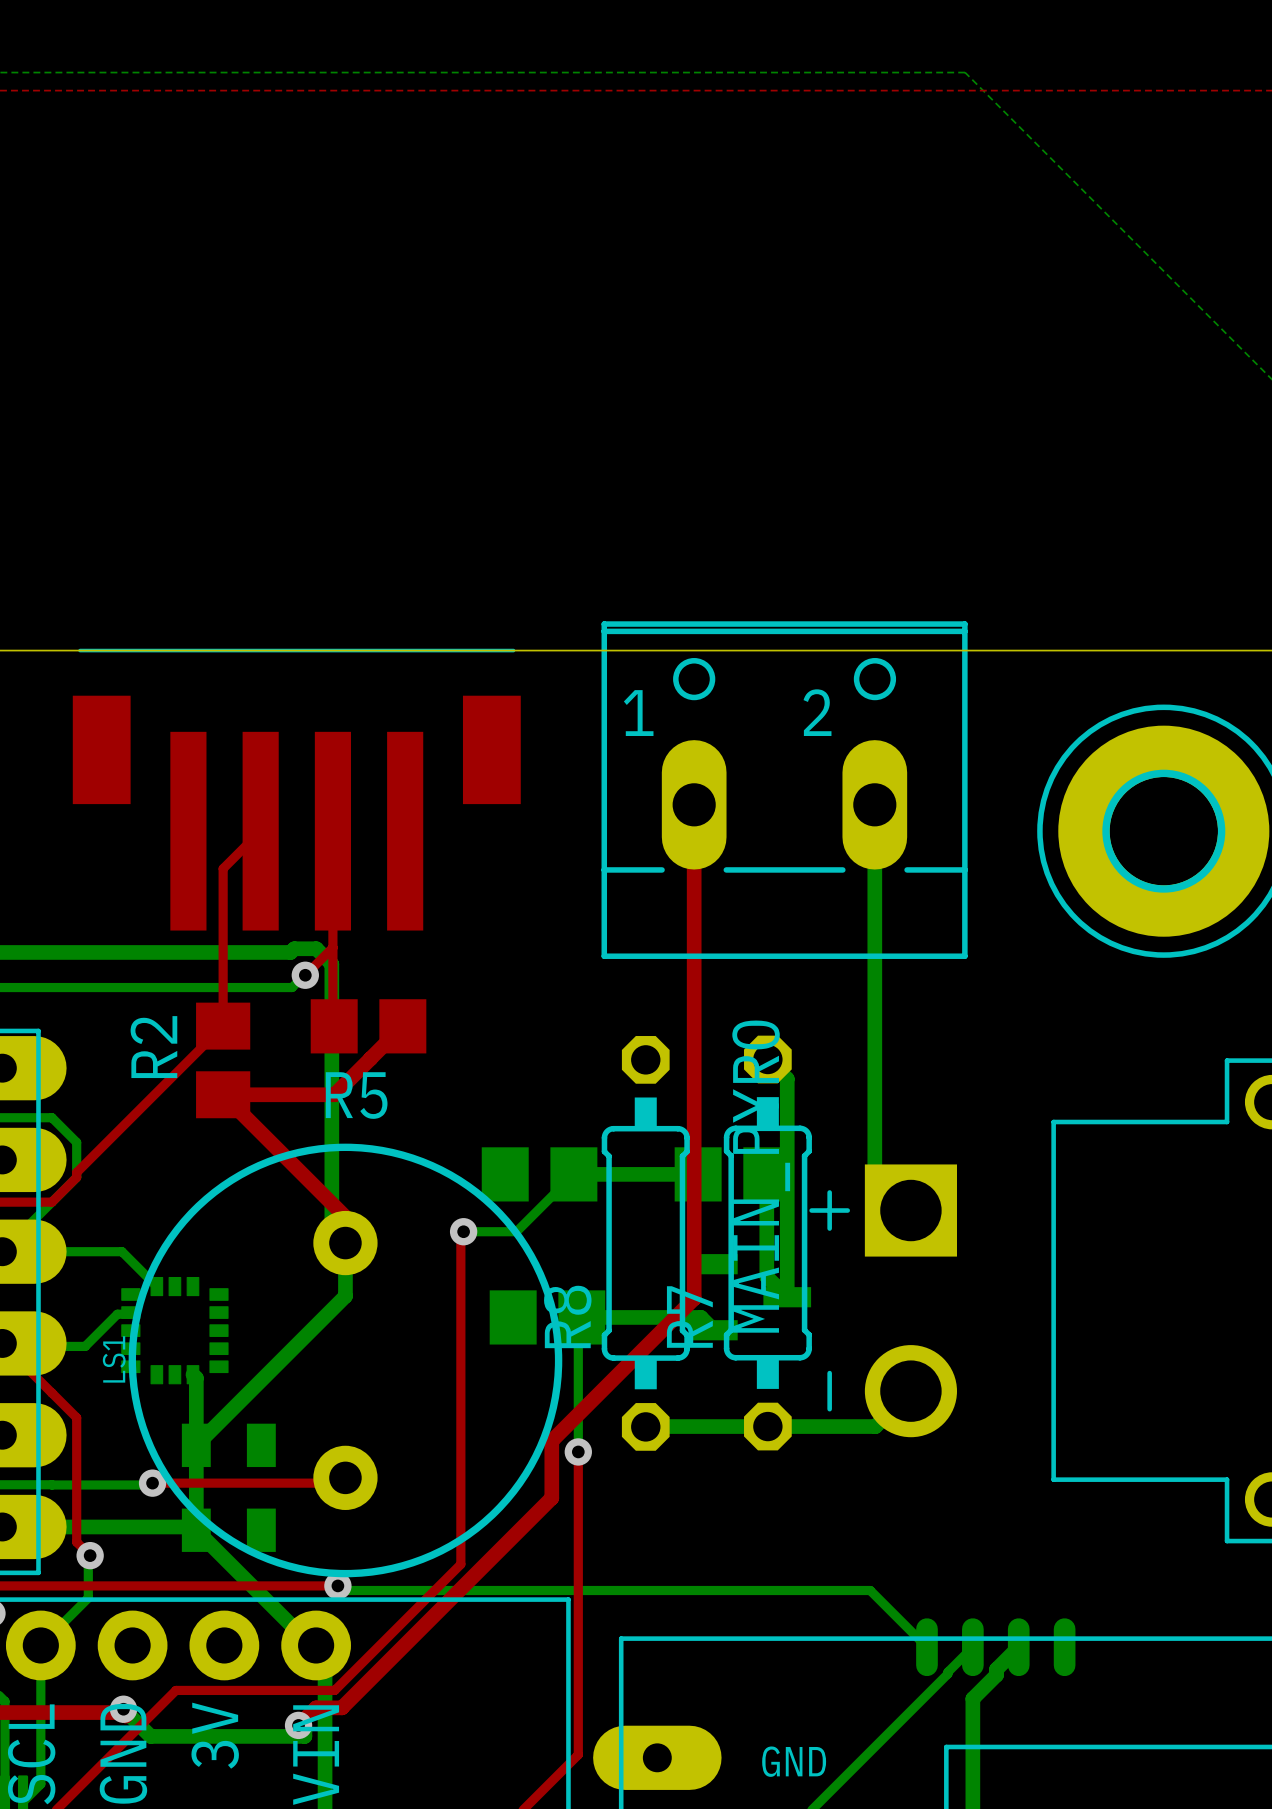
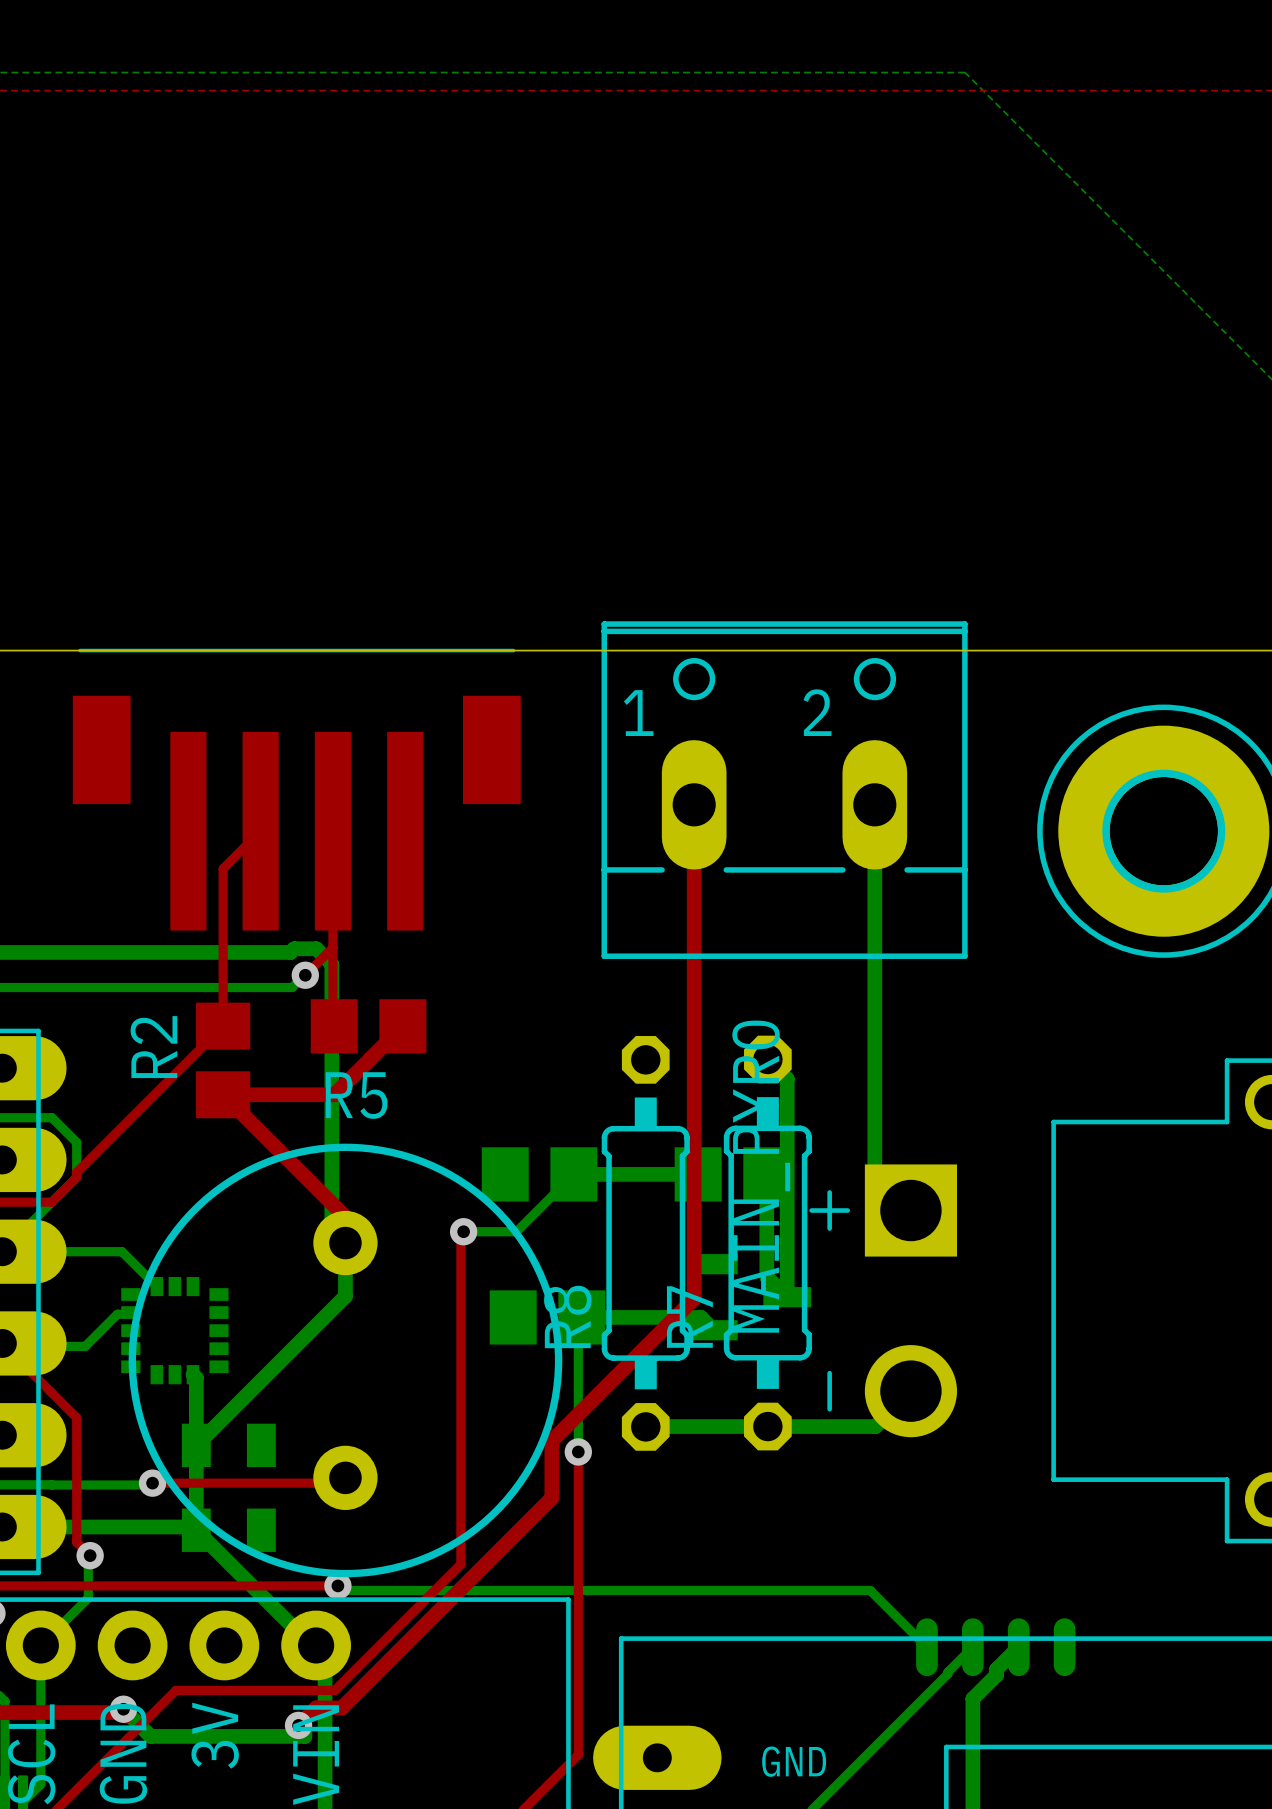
LS1 name: LS1 (114, 1359) -> none

